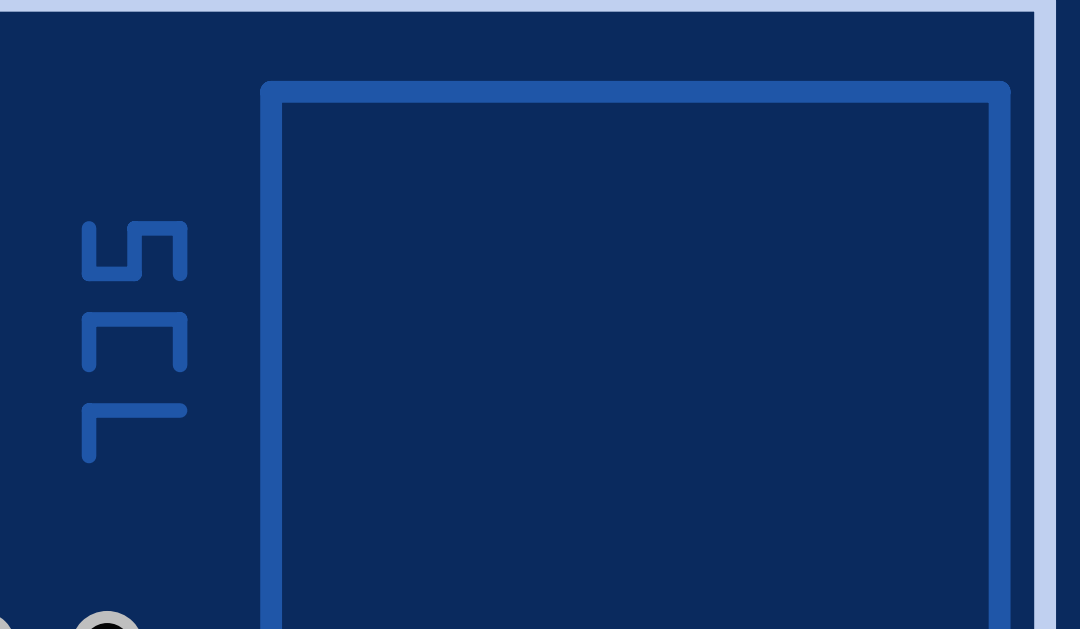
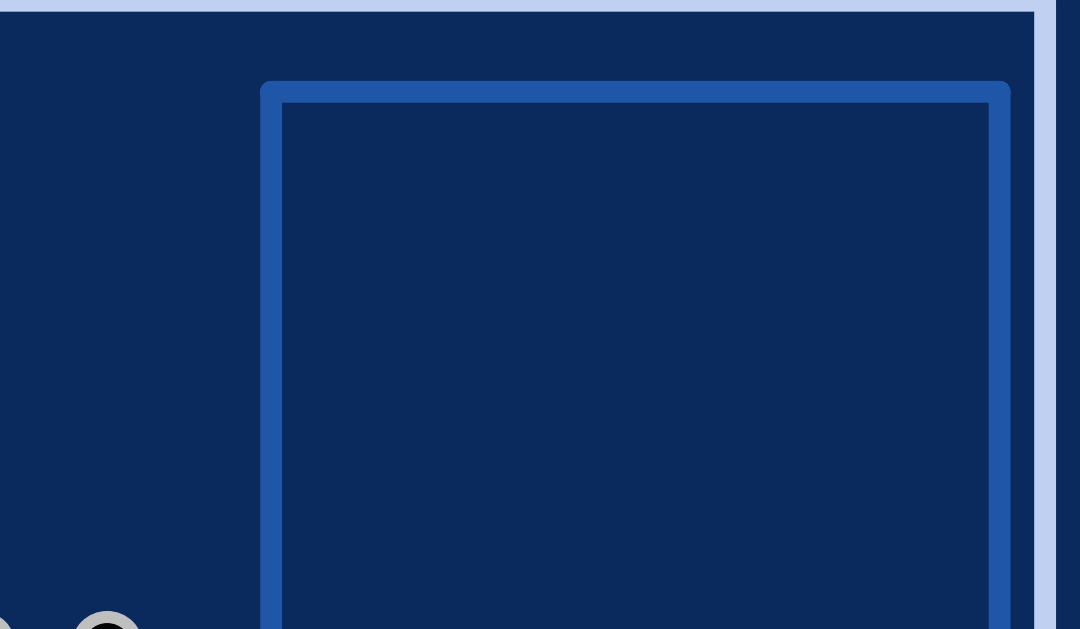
track: (89, 228) (89, 273) (134, 273) (134, 228) (180, 228) (180, 273) -> none
track: (89, 364) (89, 319) (180, 319) (180, 364) -> none
track: (180, 410) (89, 410) (89, 456) -> none

